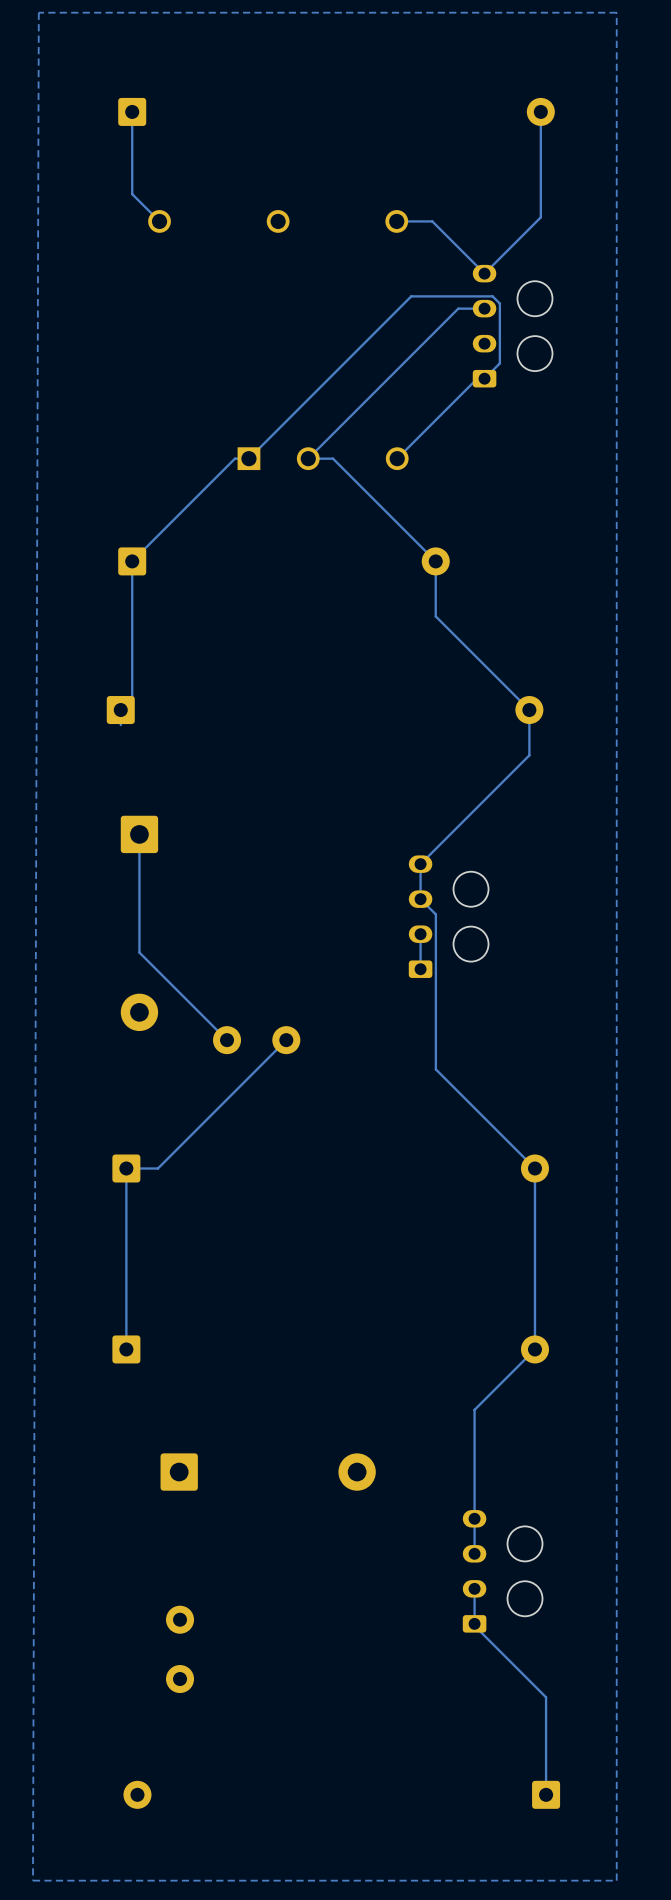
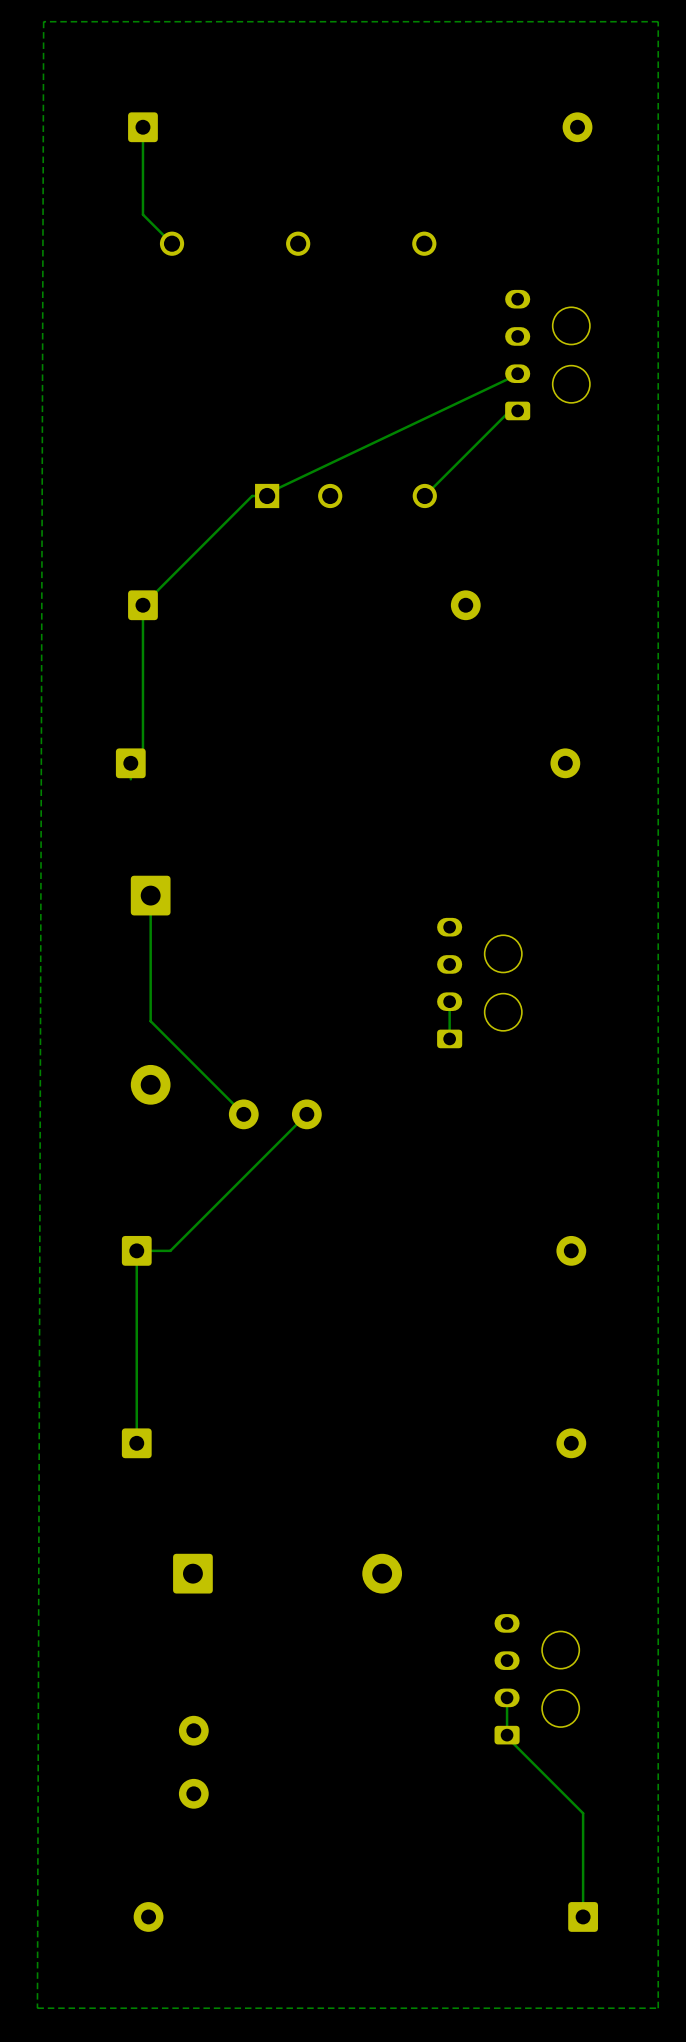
track: (540, 111) (540, 217) (484, 273) (432, 221) (396, 221) -> none
track: (484, 308) (458, 308) (308, 457) -> none
track: none -> (515, 375) (267, 493)
track: (484, 378) (499, 363) (499, 303) (492, 296) (411, 296) (248, 458) -> none
track: (308, 458) (333, 458) (435, 561) (435, 616) (529, 710) -> none
track: (529, 713) (529, 755) (421, 862) -> none
track: (420, 864) (420, 899) (435, 914) (435, 1069) (534, 1168) (534, 1343) -> none
track: (534, 1349) (474, 1409) (474, 1553) -> none

